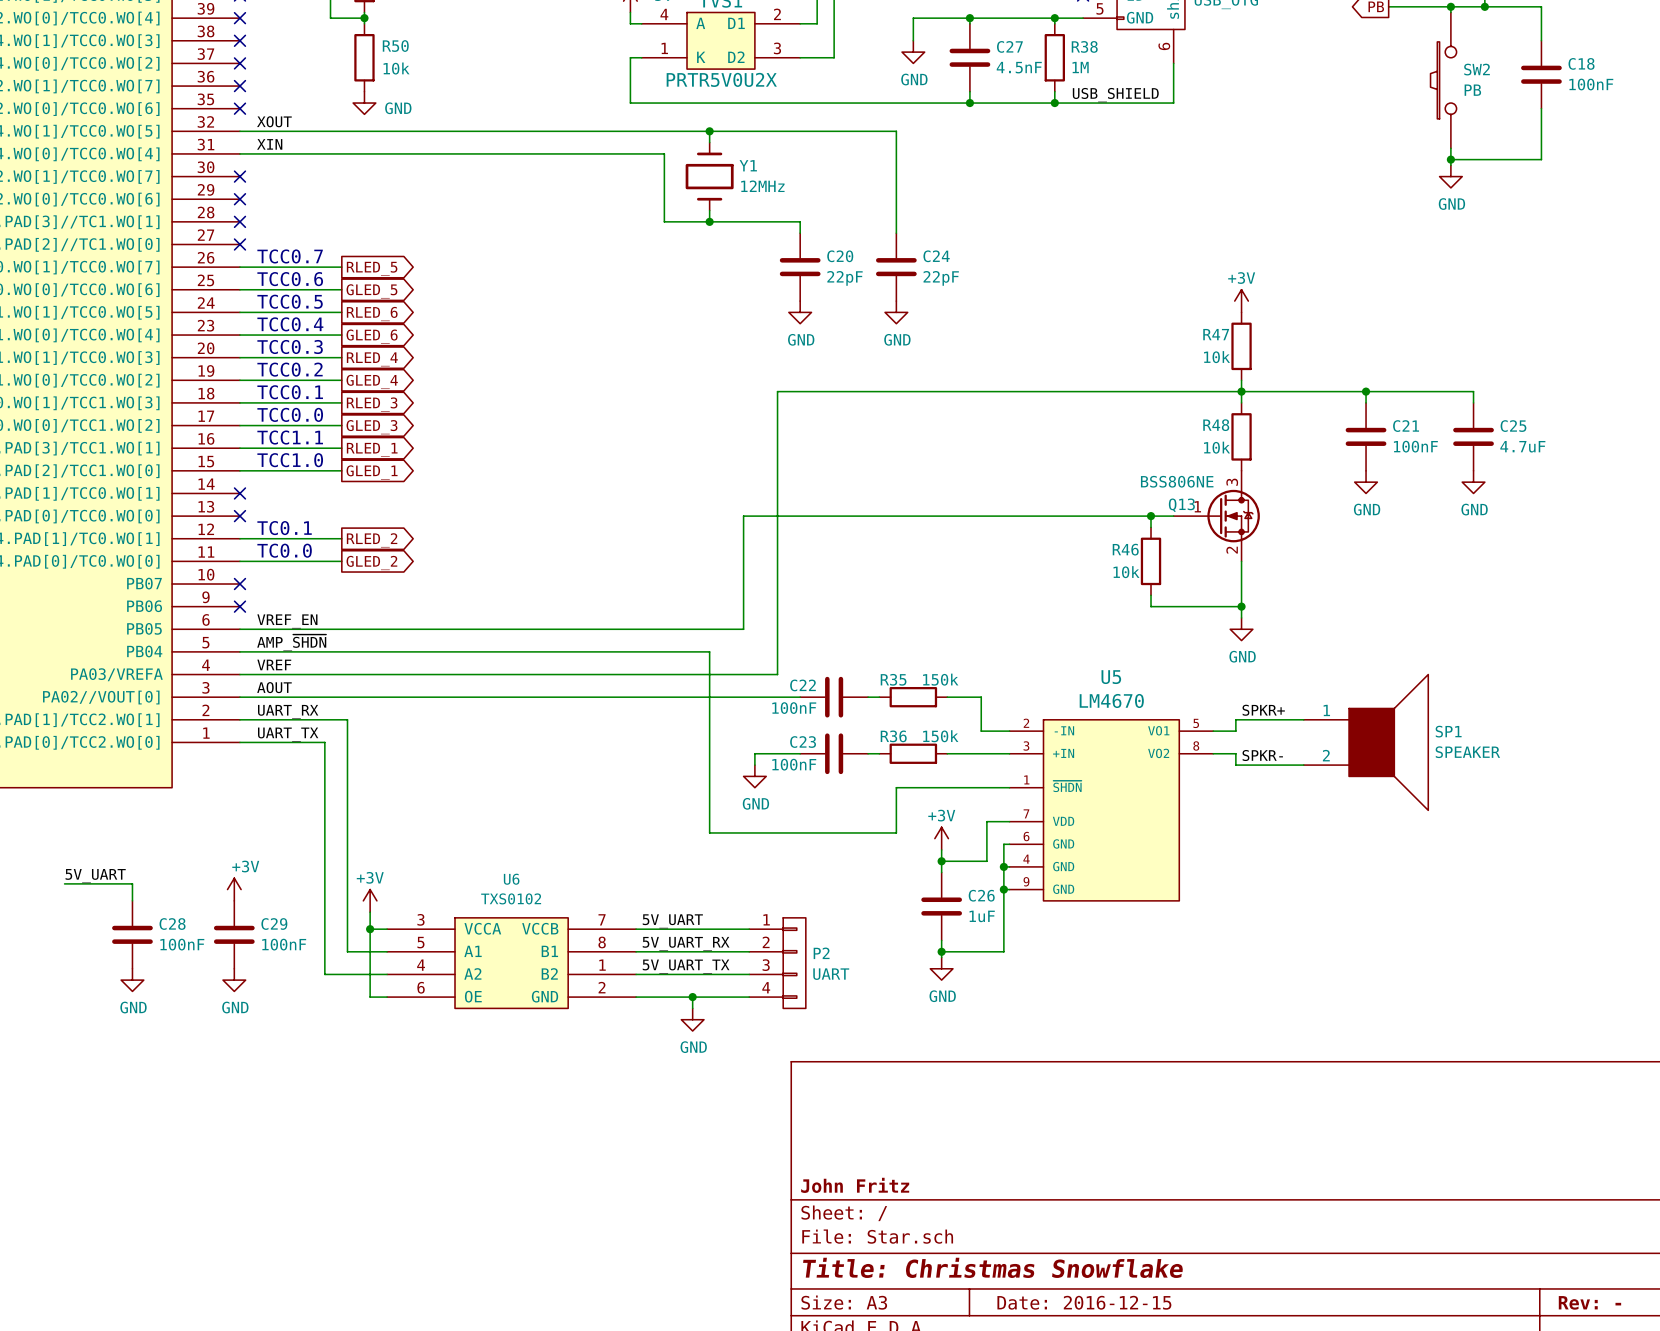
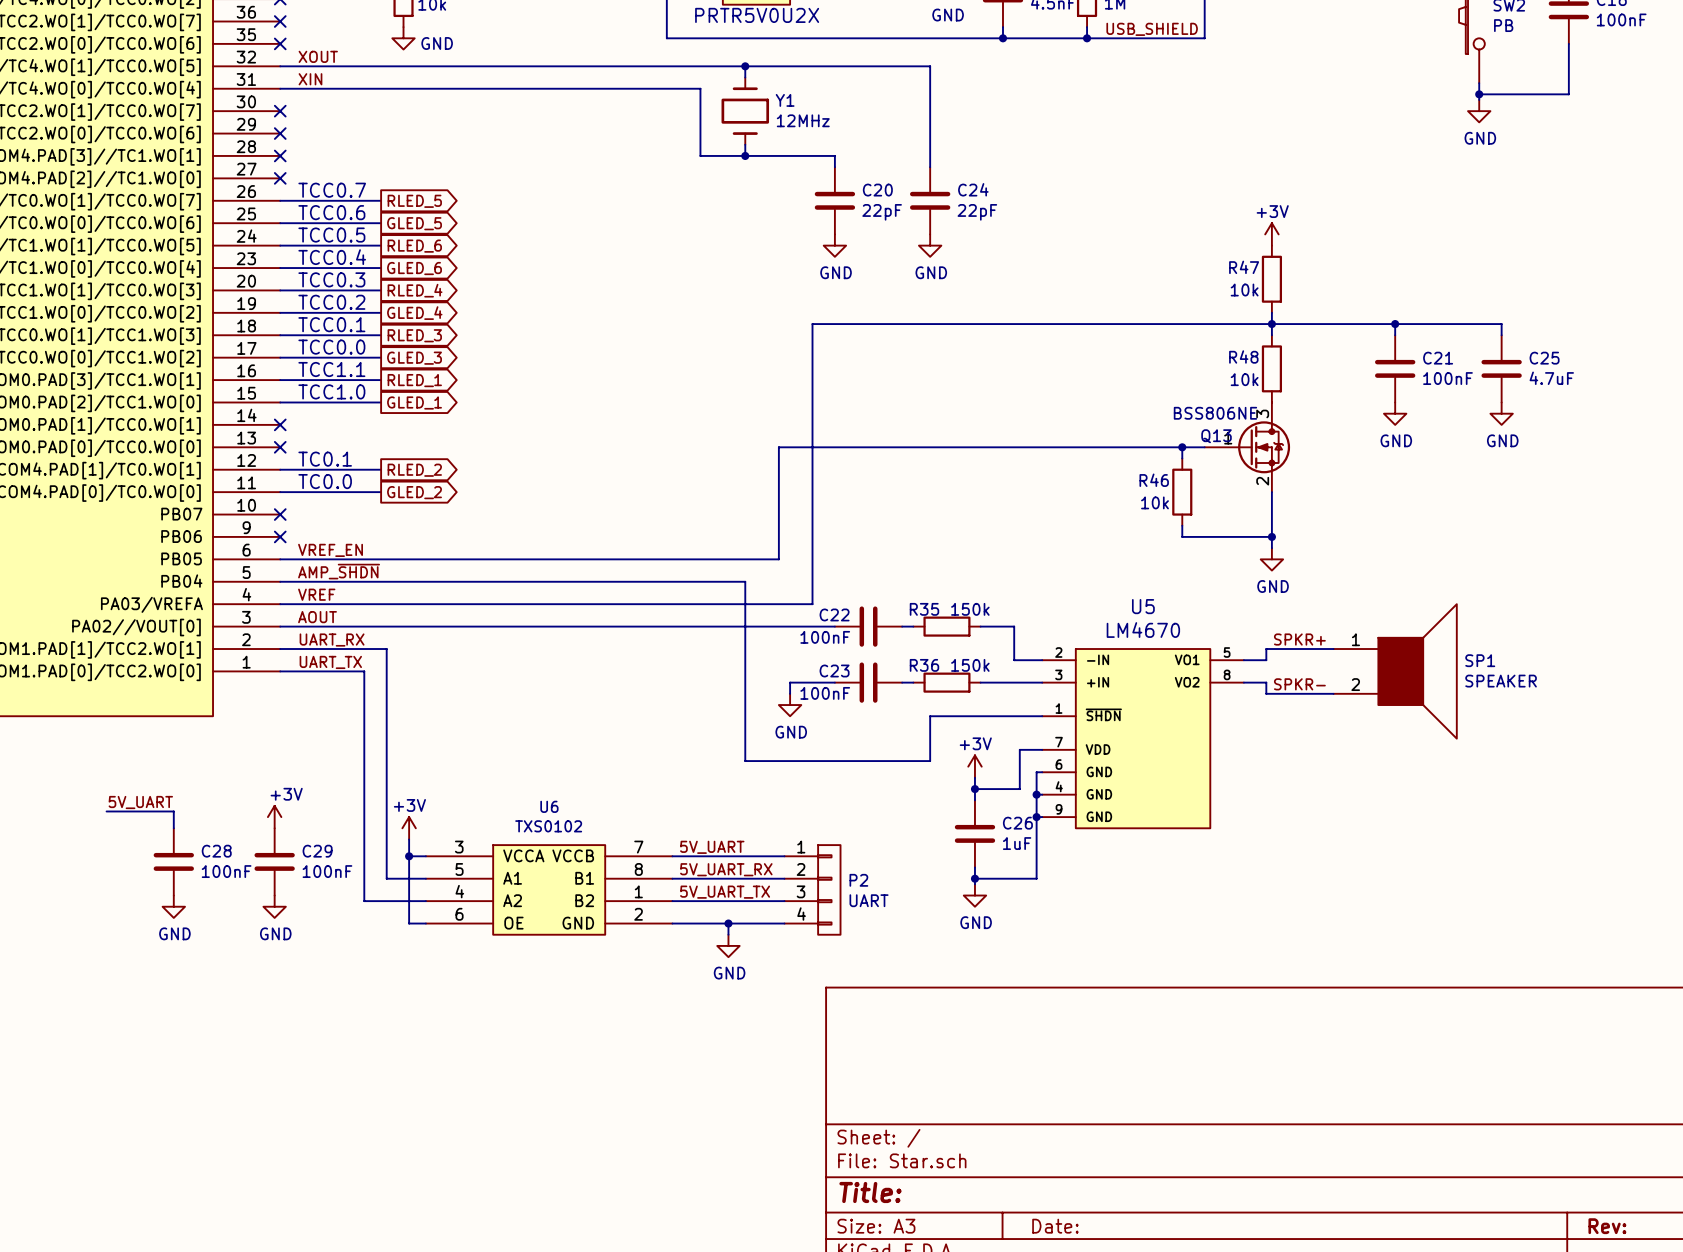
title block: John Fritz (855, 1185) -> none
title block: Title: Christmas Snowflake (993, 1267) -> Title: (870, 1192)
title block: Date: 2016-12-15 (1084, 1302) -> Date: (1055, 1226)
title block: Rev: - (1589, 1302) -> Rev: (1607, 1226)

